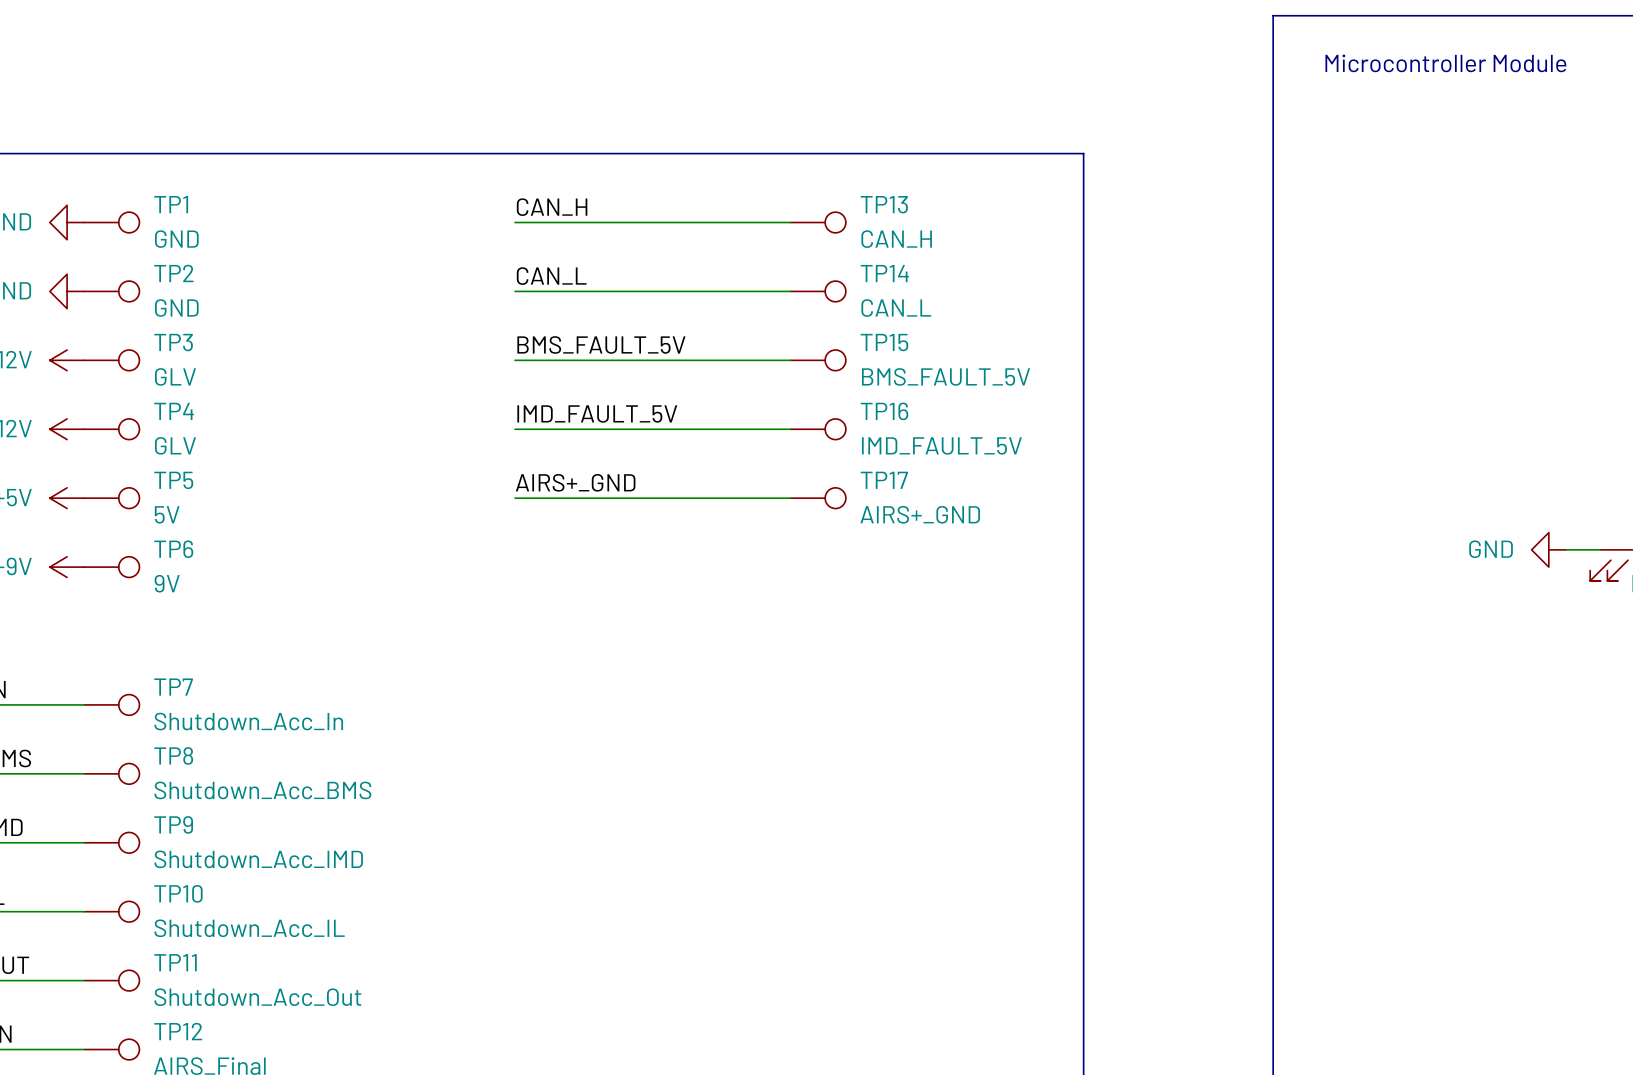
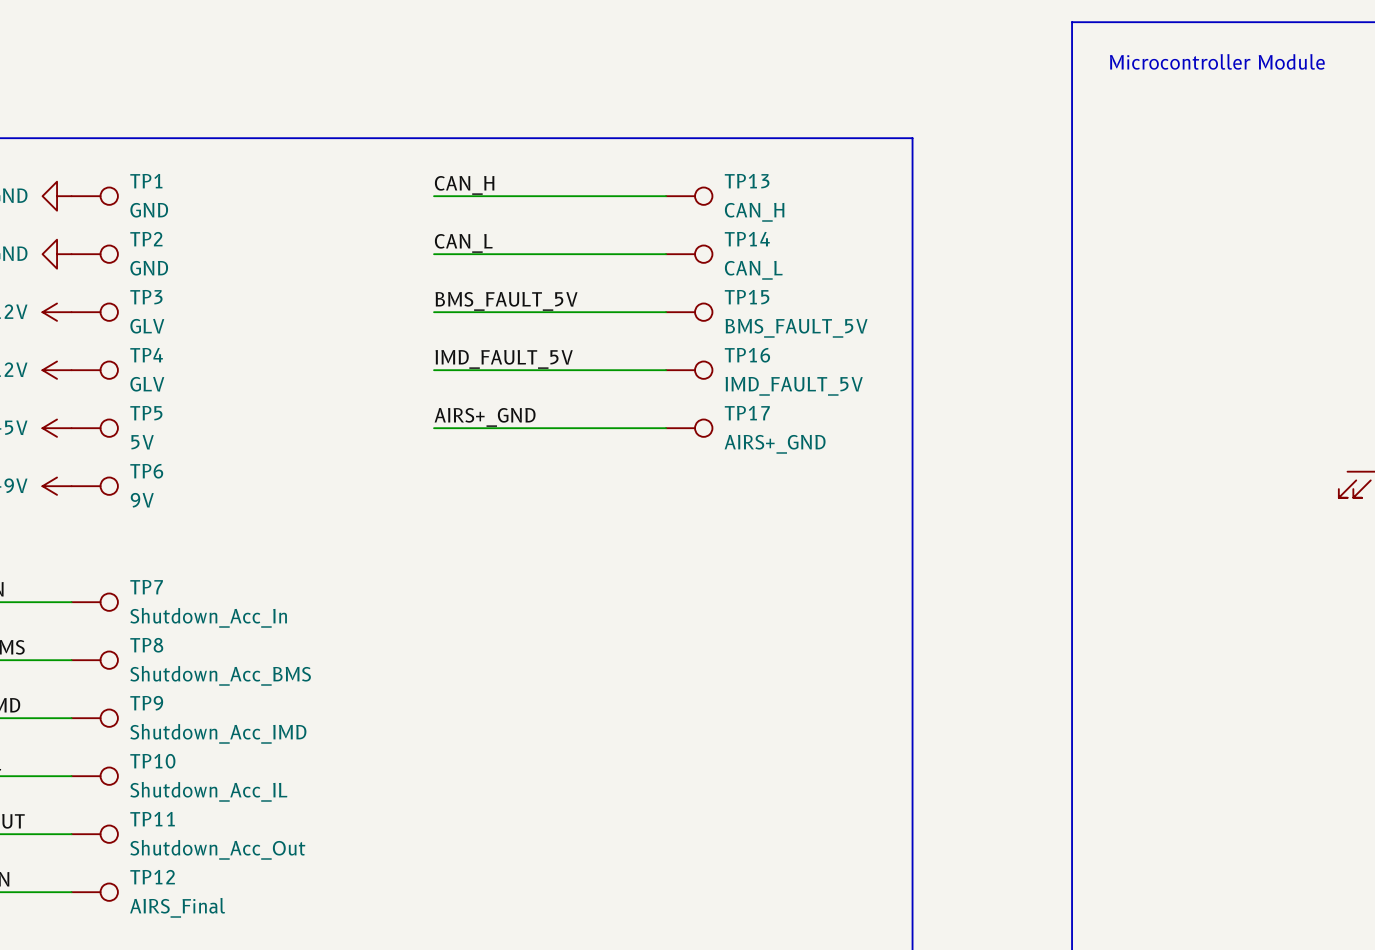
power symbol: GND (1548, 549) -> none
wire: (1566, 549) (1600, 549) -> none

